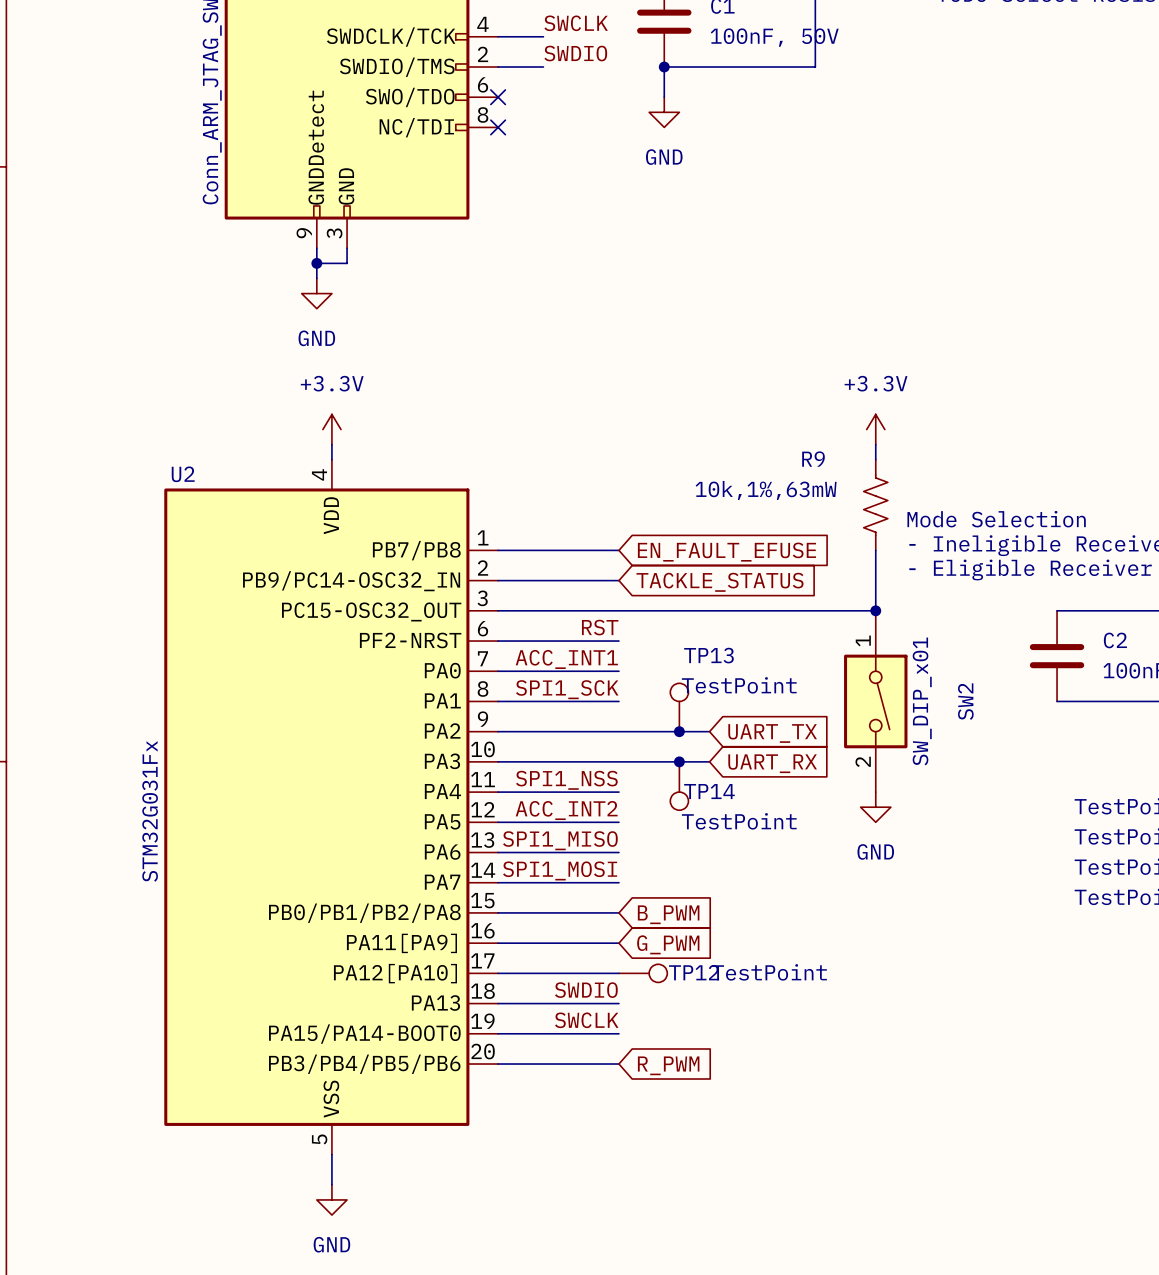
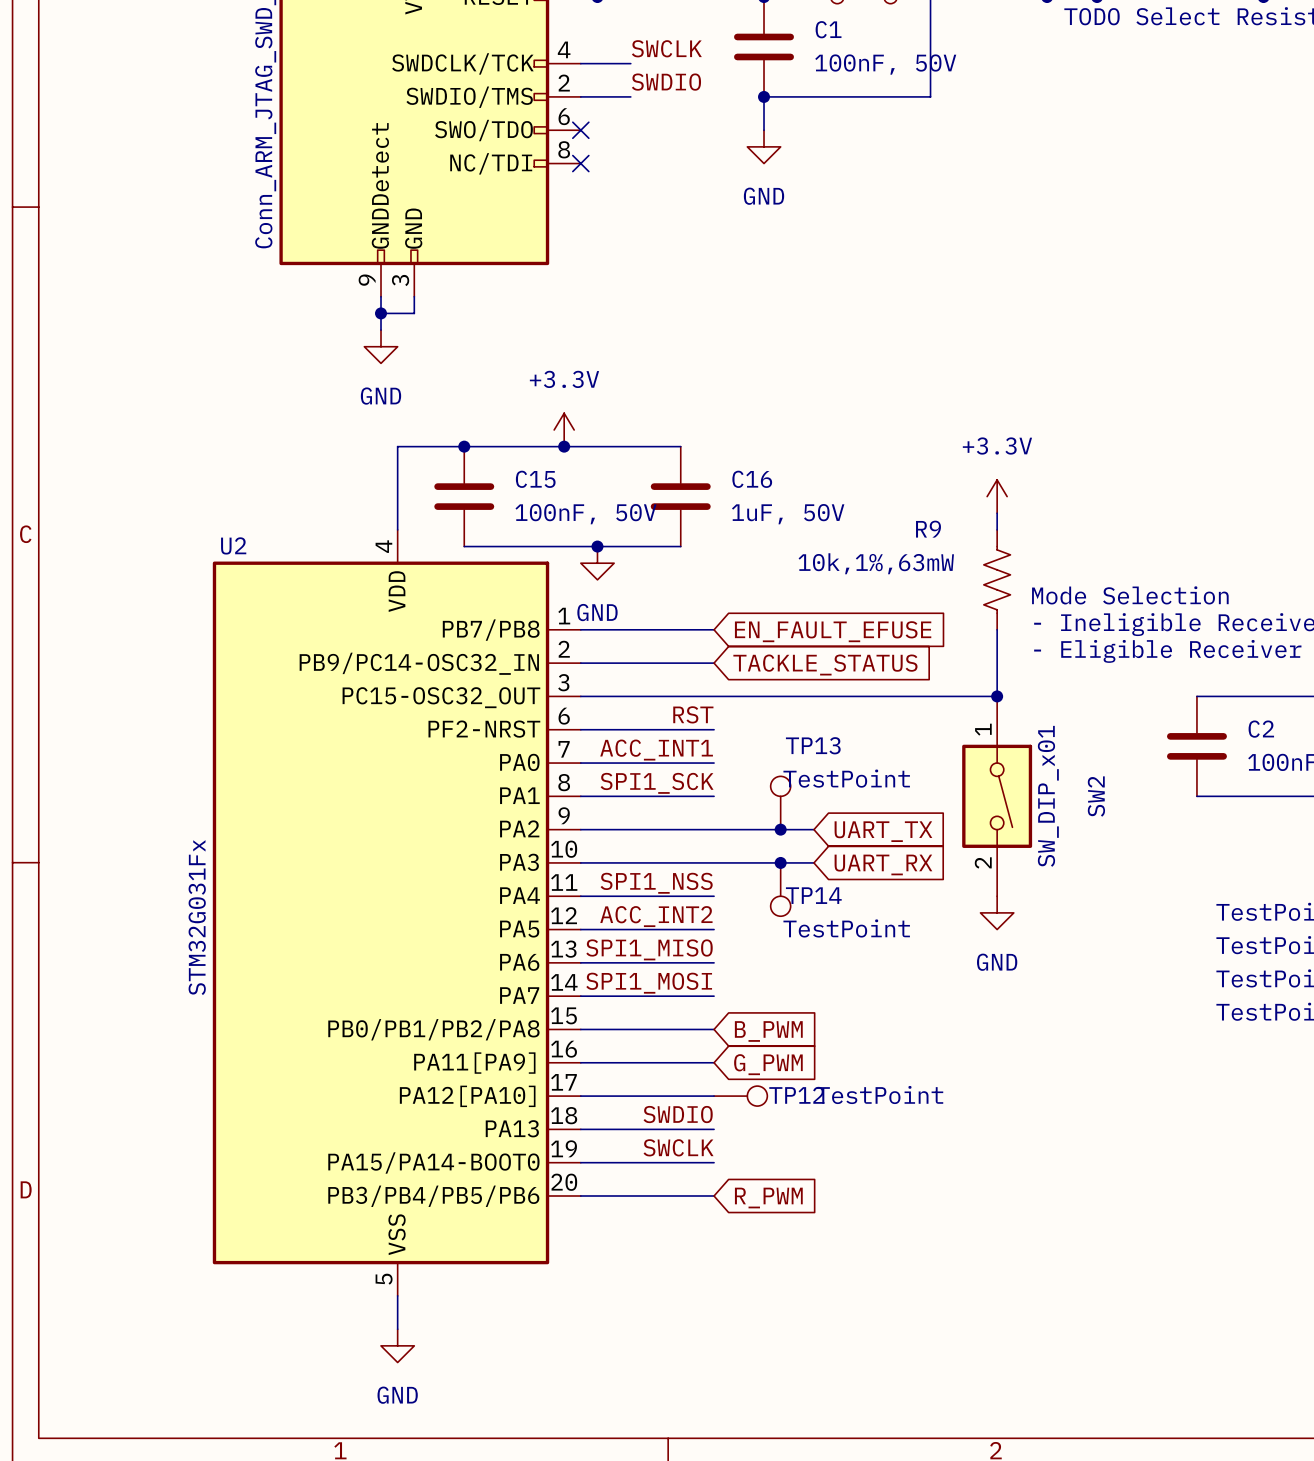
junction: none -> (464, 446)
junction: none -> (564, 446)
wire: none -> (680, 446) (397, 446) (397, 513)
power symbol position: +3.3V (331, 429) -> +3.3V (564, 429)
C15: none -> 100nF, 50V (464, 496)
C16: none -> 1uF, 50V (680, 496)
wire: none -> (464, 546) (680, 546)
junction: none -> (597, 546)
power symbol: none -> GND (597, 563)

